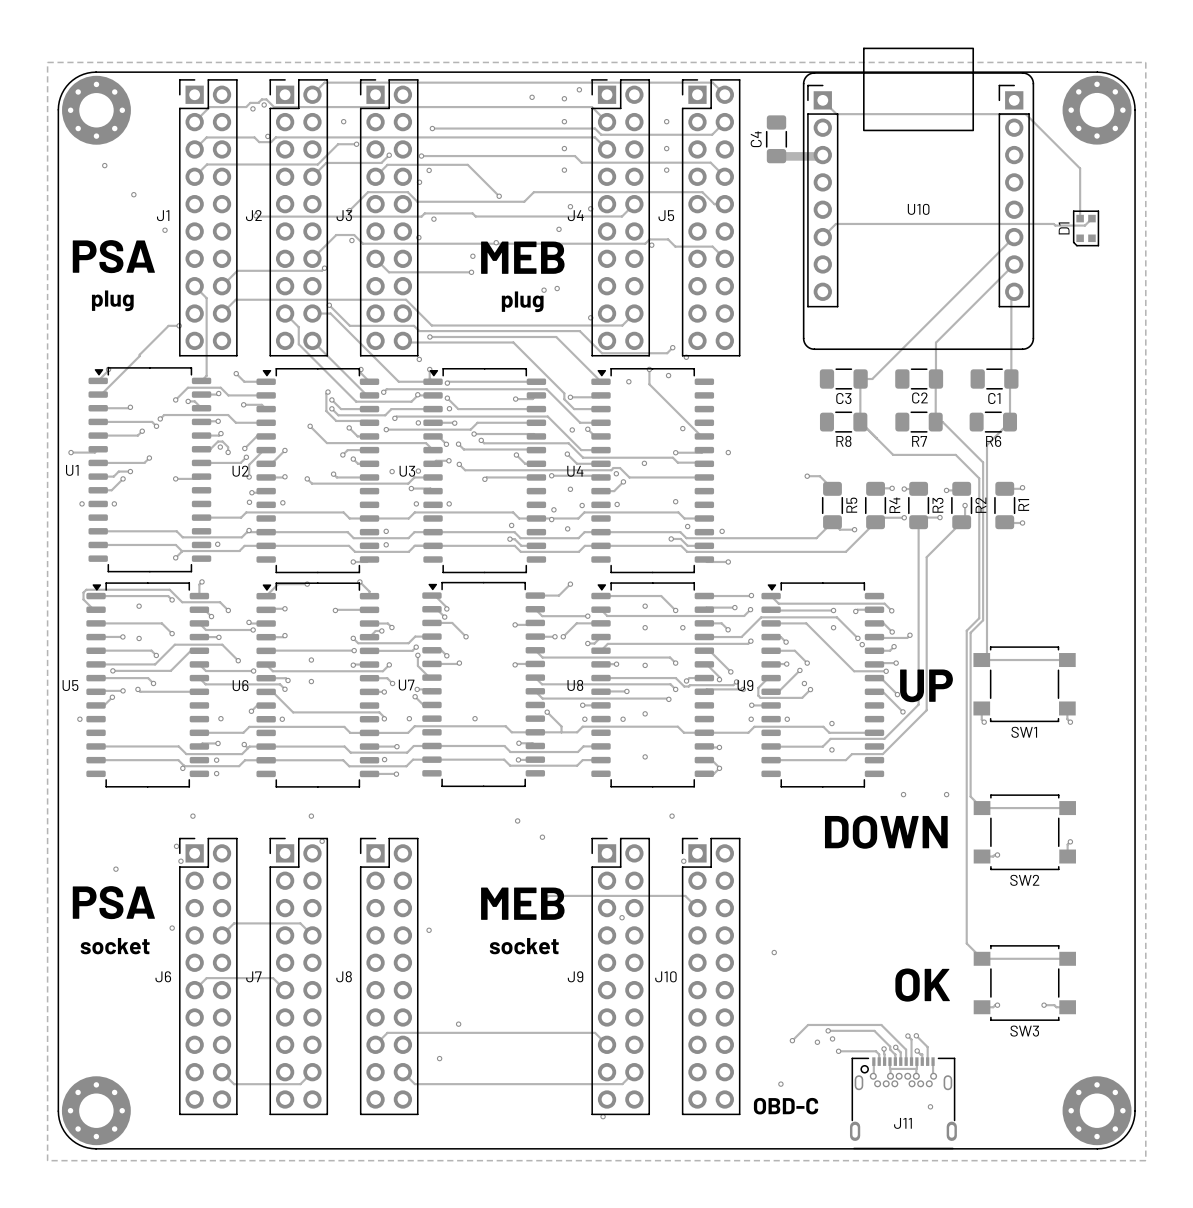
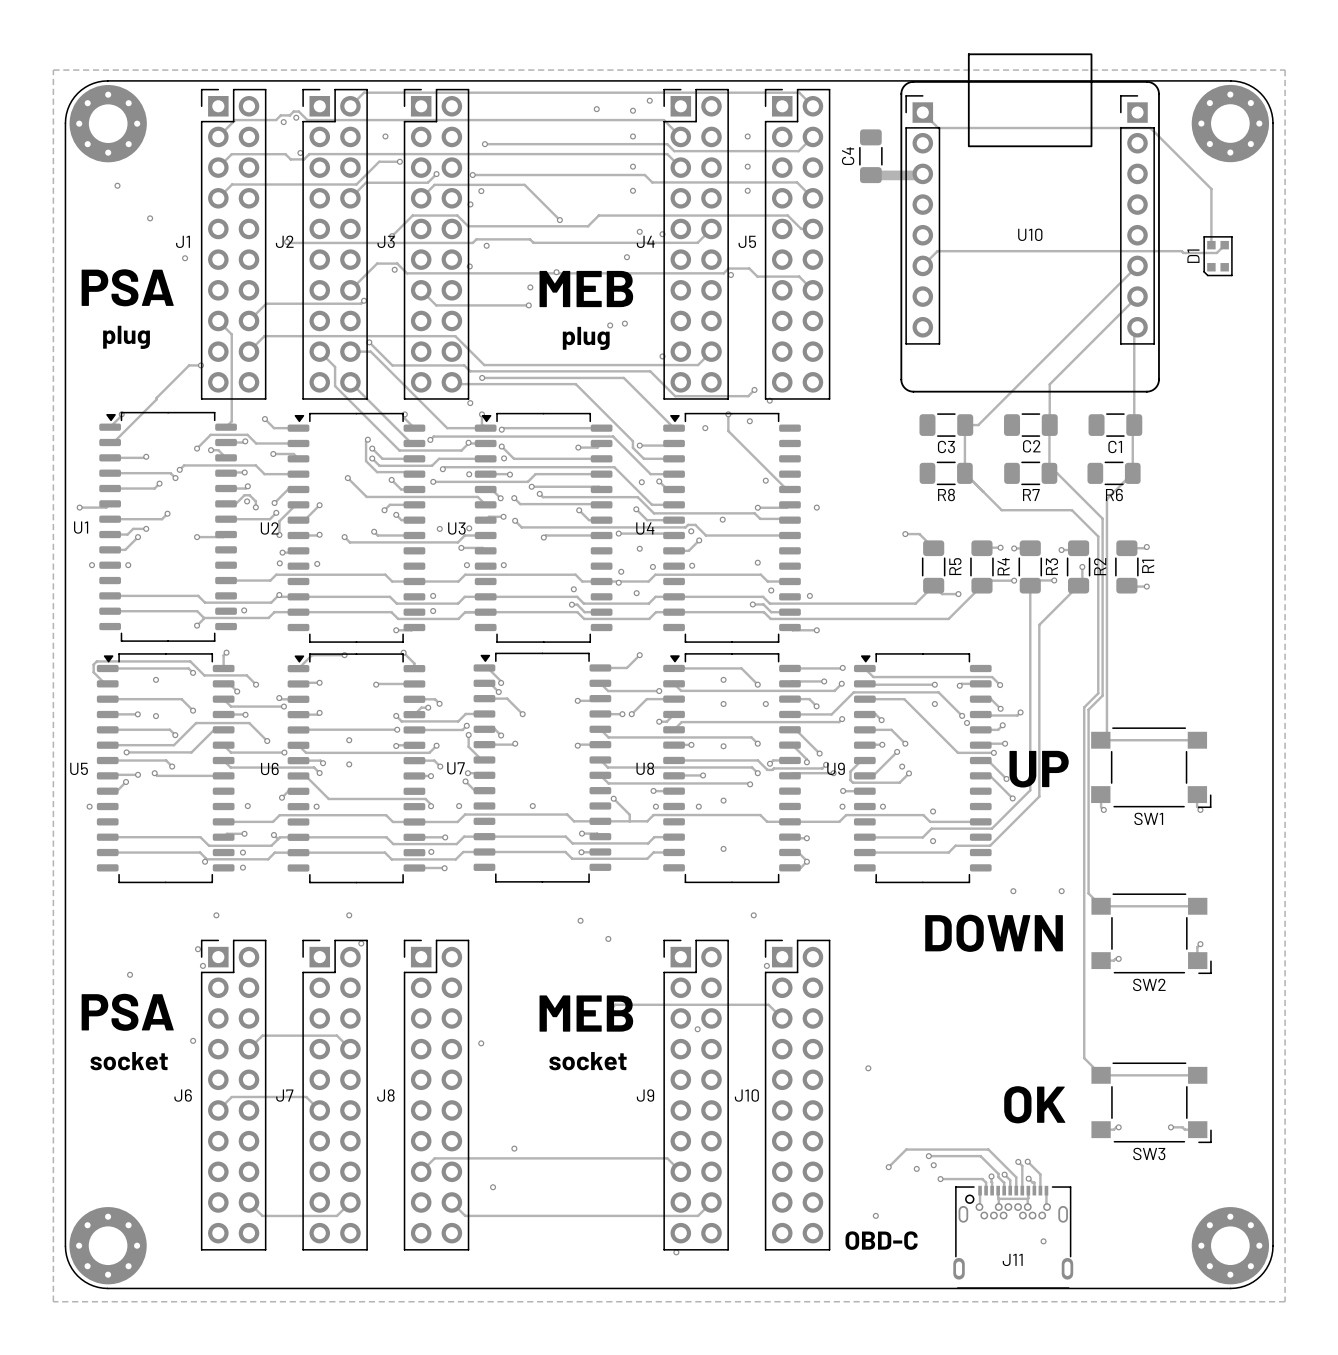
SW1 footprint: [973, 646, 1076, 723] -> [1091, 727, 1212, 808]
SW2 footprint: [973, 794, 1076, 871] -> [1091, 893, 1212, 975]
SW3 footprint: [973, 945, 1076, 1021] -> [1091, 1062, 1212, 1144]

